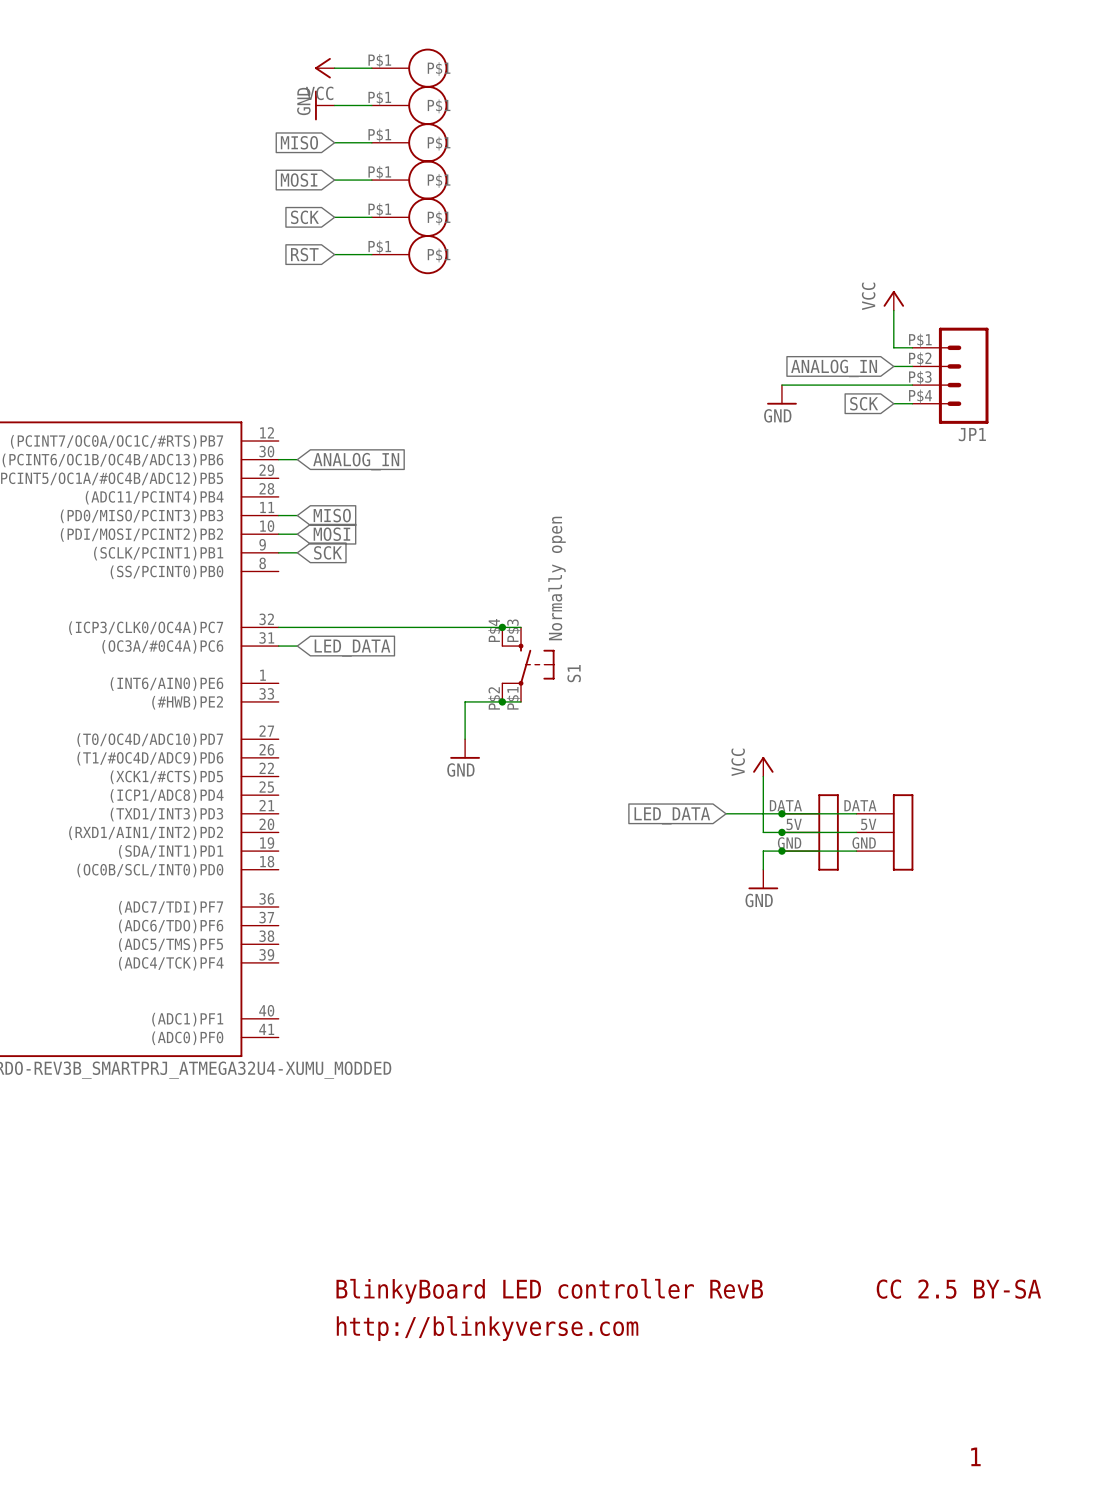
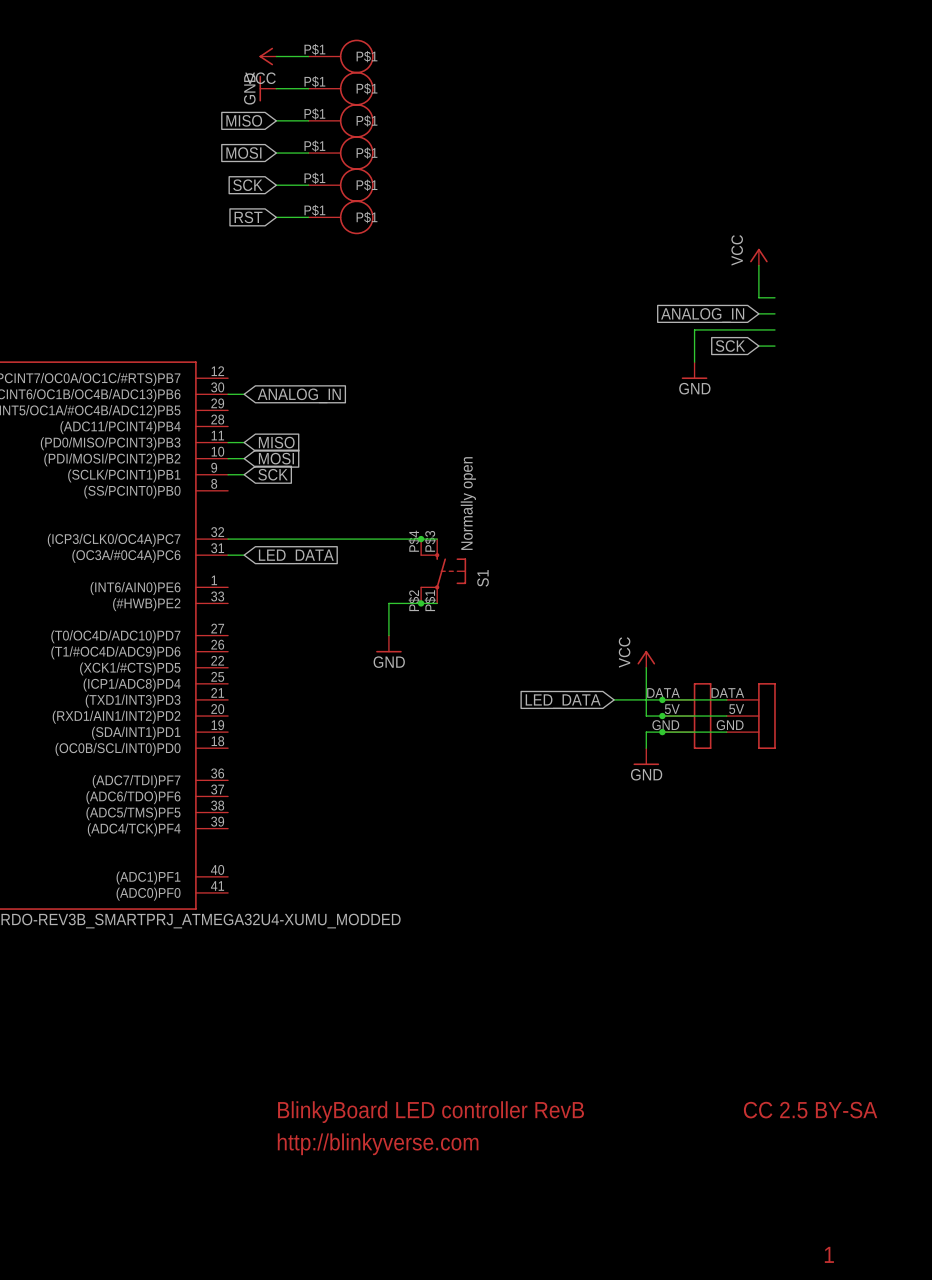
JP1: (950, 375) -> none
wire: (781, 385) (819, 385) -> (694, 362) (694, 329)
power symbol position: GND (781, 394) -> GND (694, 370)

